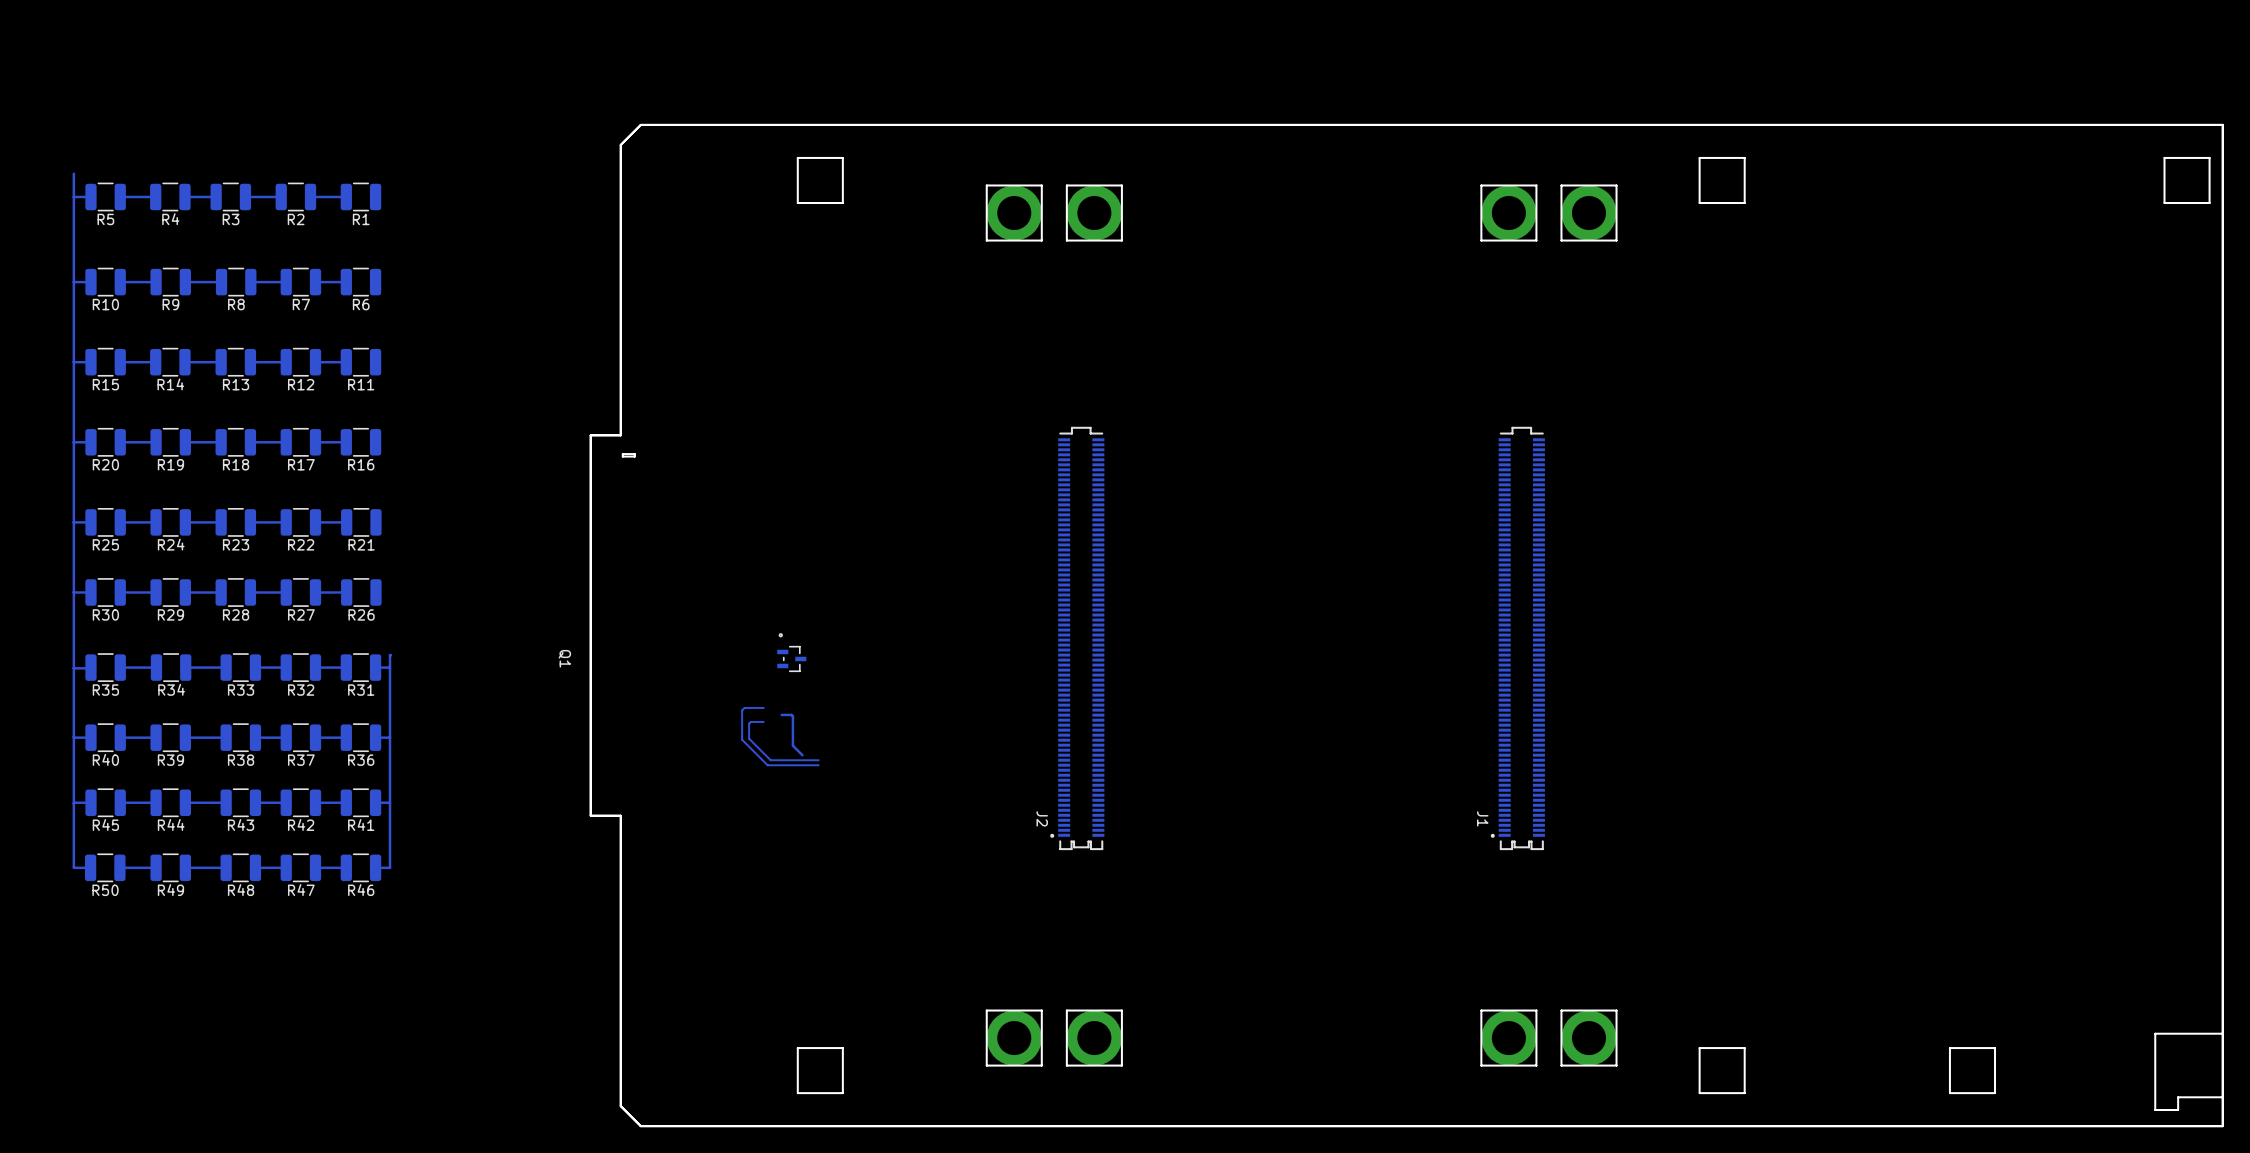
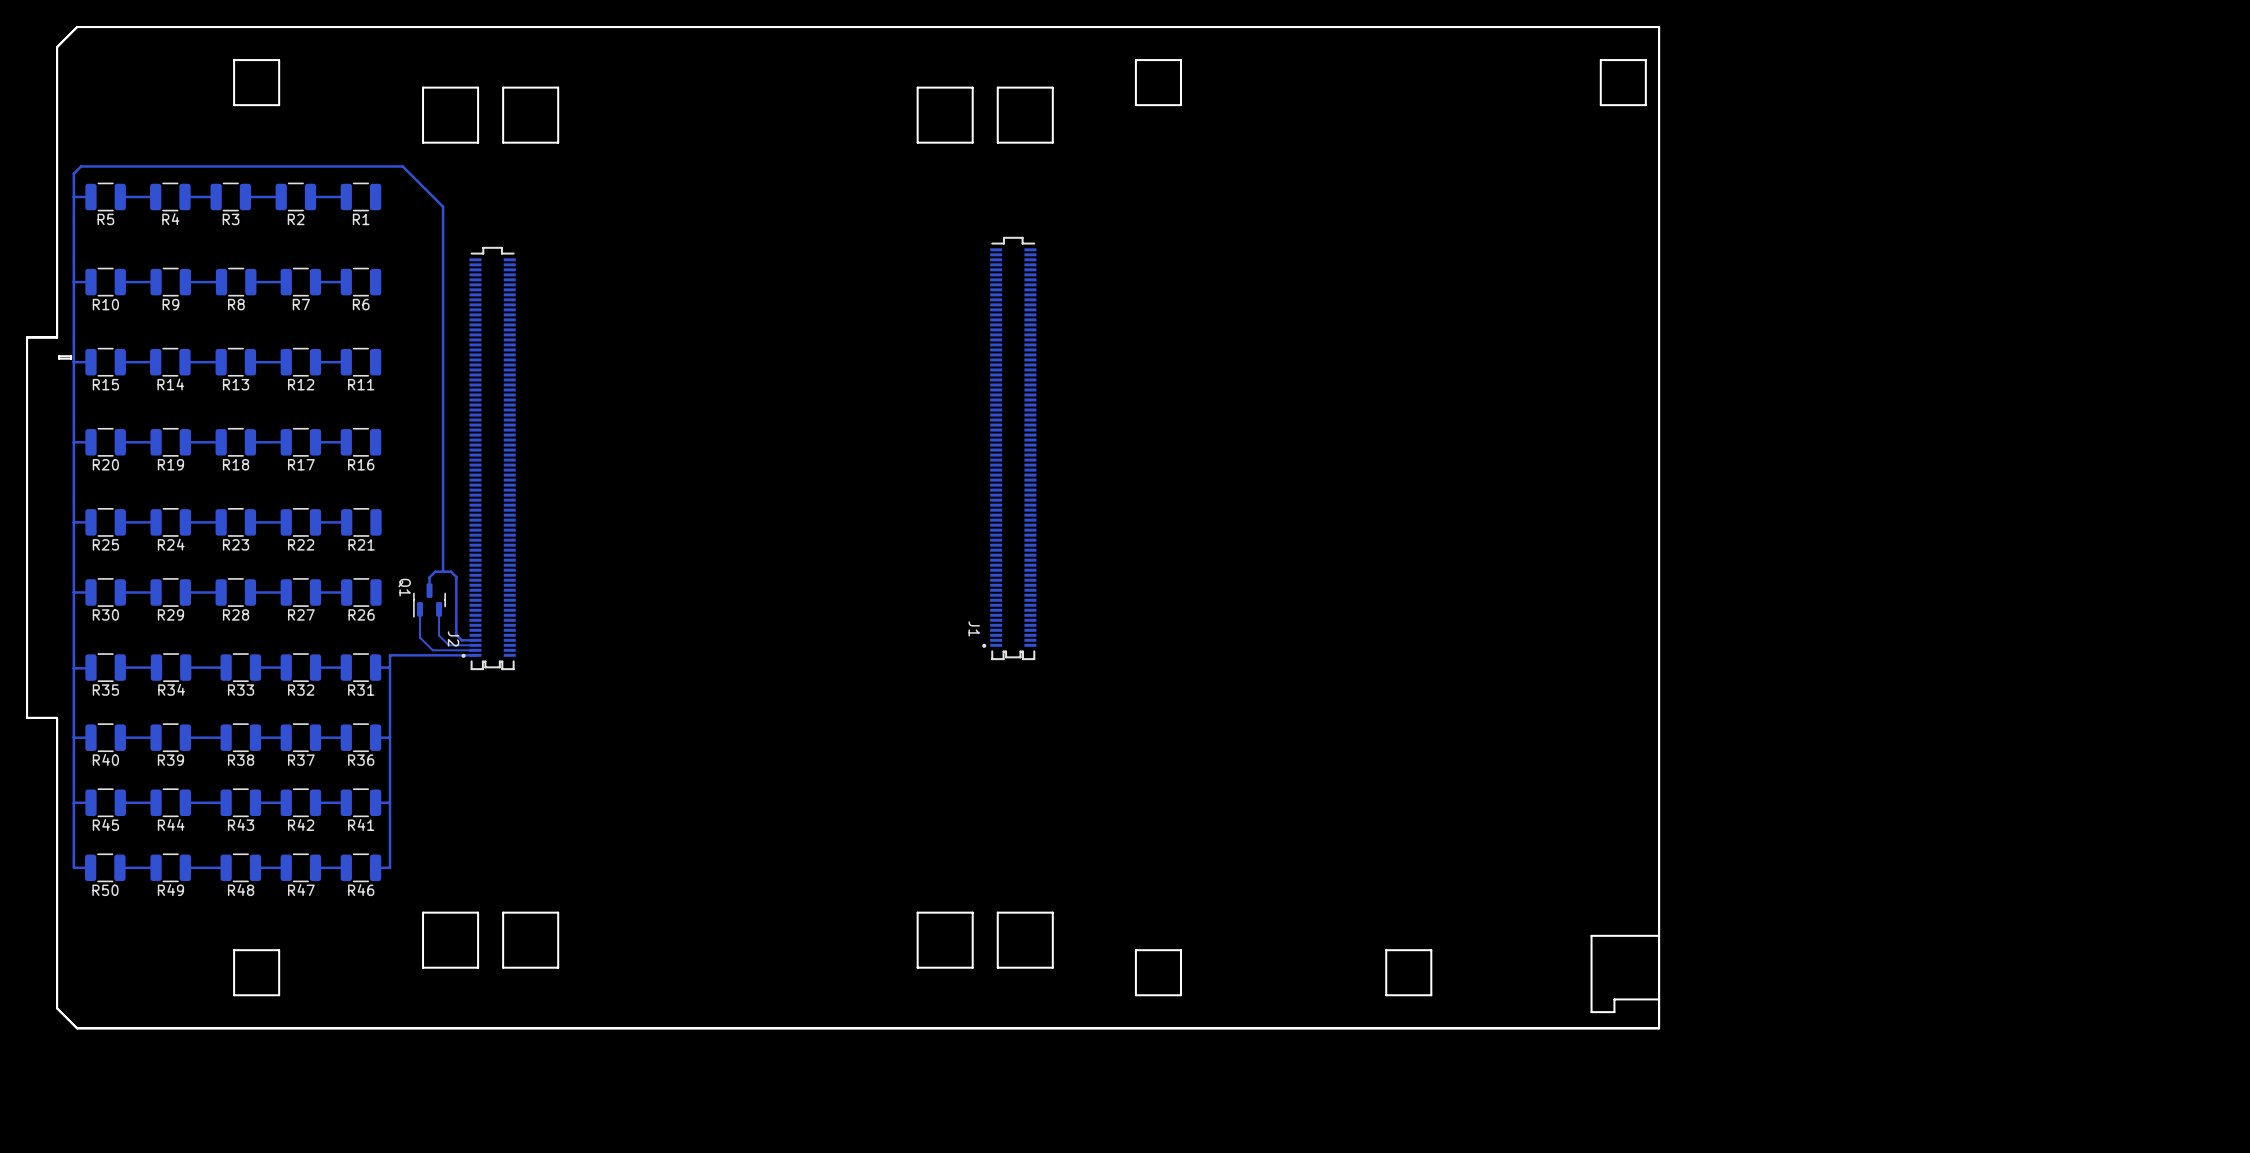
board edge: none -> (1659, 27) (77, 27) (57, 47) (57, 337) (27, 337) (27, 717) (57, 717) (57, 1008) (77, 1028) (1659, 1028) (1659, 27)
board edge: none -> (279, 60) (234, 60) (234, 105) (279, 105) (279, 60)
board edge: none -> (1180, 60) (1135, 60) (1135, 105) (1180, 105) (1180, 60)
board edge: none -> (478, 87) (423, 87) (423, 142) (478, 142) (478, 87)
board edge: none -> (558, 87) (558, 142) (503, 142) (503, 87) (558, 87)
board edge: (2222, 124) (640, 124) (620, 144) (620, 435) (590, 435) (590, 815) (620, 815) (620, 1106) (640, 1126) (2222, 1126) (2222, 124) -> none
board edge: (842, 157) (797, 157) (797, 203) (842, 203) (842, 157) -> none
board edge: (1744, 157) (1699, 157) (1699, 203) (1744, 203) (1744, 157) -> (1645, 60) (1600, 60) (1600, 105) (1645, 105) (1645, 60)
board edge: (2209, 157) (2164, 157) (2164, 203) (2209, 203) (2209, 157) -> none
track: none -> (73, 173) (81, 166) (402, 166) (443, 206) (443, 571)
board edge: (1041, 185) (986, 185) (986, 240) (1041, 240) (1041, 185) -> (972, 87) (917, 87) (917, 142) (972, 142) (972, 87)
board edge: (1121, 185) (1121, 240) (1066, 240) (1066, 185) (1121, 185) -> (1052, 87) (1052, 142) (997, 142) (997, 87) (1052, 87)
board edge: (1536, 185) (1536, 240) (1481, 240) (1481, 185) (1536, 185) -> none
board edge: (1616, 185) (1561, 185) (1561, 240) (1616, 240) (1616, 185) -> none
part: (1014, 213) -> none
part: (1094, 213) -> none
part: (1508, 213) -> none
part: (1588, 213) -> none
board edge: none -> (71, 356) (59, 356) (59, 358) (71, 358) (71, 356)
board edge: (634, 454) (622, 454) (622, 456) (634, 456) (634, 454) -> none
track: none -> (429, 590) (429, 577) (435, 571) (451, 571) (456, 576) (456, 634) (461, 640) (475, 640)
track: none -> (420, 609) (420, 637) (432, 650) (475, 650)
track: none -> (439, 609) (439, 635) (448, 645) (475, 645)
Q1 footprint: [777, 633, 807, 672] -> [413, 583, 446, 618]
J2 position: (1077, 638) -> (488, 458)
J1 position: (1517, 638) -> (1009, 448)
track: none -> (475, 655) (390, 655)
Q1 name position: Q1 (564, 658) -> Q1 (404, 587)
track: (763, 707) (744, 707) (742, 710) (742, 739) (767, 765) (818, 765) -> none
track: (781, 714) (792, 716) (792, 745) (802, 755) -> none
track: (763, 721) (750, 721) (749, 723) (749, 738) (770, 760) (818, 760) -> none
board edge: none -> (478, 912) (478, 967) (423, 967) (423, 912) (478, 912)
board edge: none -> (558, 912) (558, 967) (503, 967) (503, 912) (558, 912)
board edge: none -> (1659, 935) (1591, 935) (1591, 1012) (1614, 1012) (1614, 999) (1659, 999)
board edge: none -> (279, 950) (234, 950) (234, 995) (279, 995) (279, 950)
board edge: none -> (1180, 950) (1135, 950) (1135, 995) (1180, 995) (1180, 950)
board edge: none -> (1431, 950) (1386, 950) (1386, 995) (1431, 995) (1431, 950)
board edge: (1041, 1010) (1041, 1065) (986, 1065) (986, 1010) (1041, 1010) -> (972, 912) (972, 967) (917, 967) (917, 912) (972, 912)
board edge: (1121, 1010) (1121, 1065) (1066, 1065) (1066, 1010) (1121, 1010) -> (1052, 912) (1052, 967) (997, 967) (997, 912) (1052, 912)
board edge: (1536, 1010) (1536, 1065) (1481, 1065) (1481, 1010) (1536, 1010) -> none
board edge: (1616, 1010) (1561, 1010) (1561, 1065) (1616, 1065) (1616, 1010) -> none
board edge: (2222, 1033) (2155, 1033) (2155, 1110) (2178, 1110) (2178, 1097) (2222, 1097) -> none
part: (1014, 1038) -> none
part: (1094, 1038) -> none
part: (1508, 1038) -> none
part: (1588, 1038) -> none
board edge: (842, 1048) (797, 1048) (797, 1093) (842, 1093) (842, 1048) -> none
board edge: (1744, 1048) (1699, 1048) (1699, 1093) (1744, 1093) (1744, 1048) -> none
board edge: (1995, 1048) (1949, 1048) (1949, 1093) (1995, 1093) (1995, 1048) -> none

